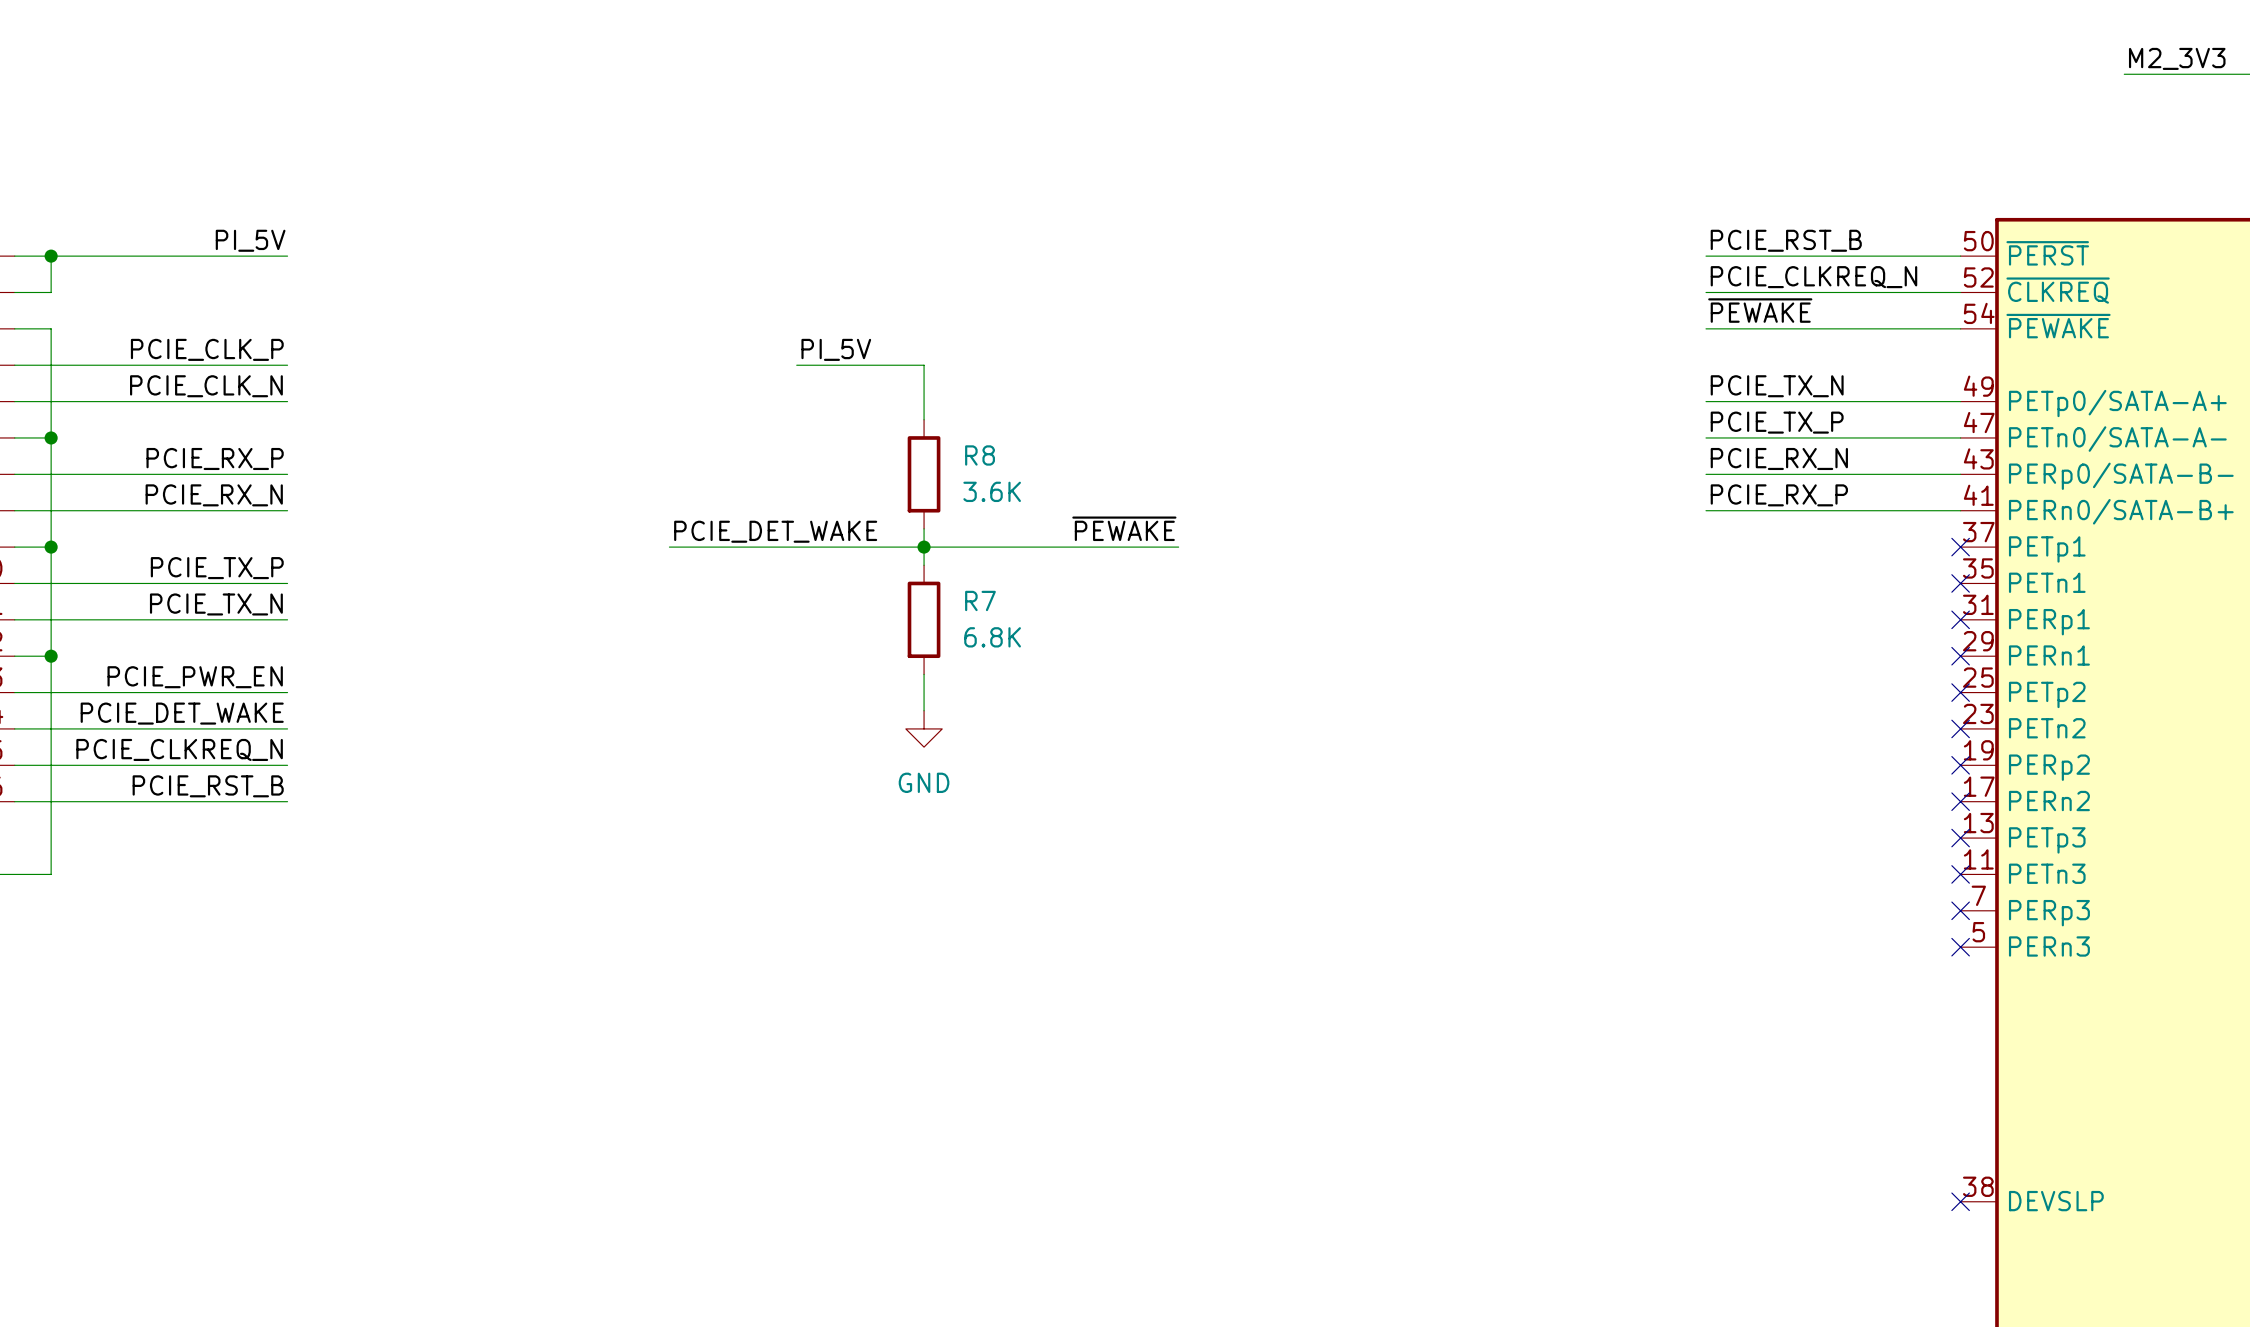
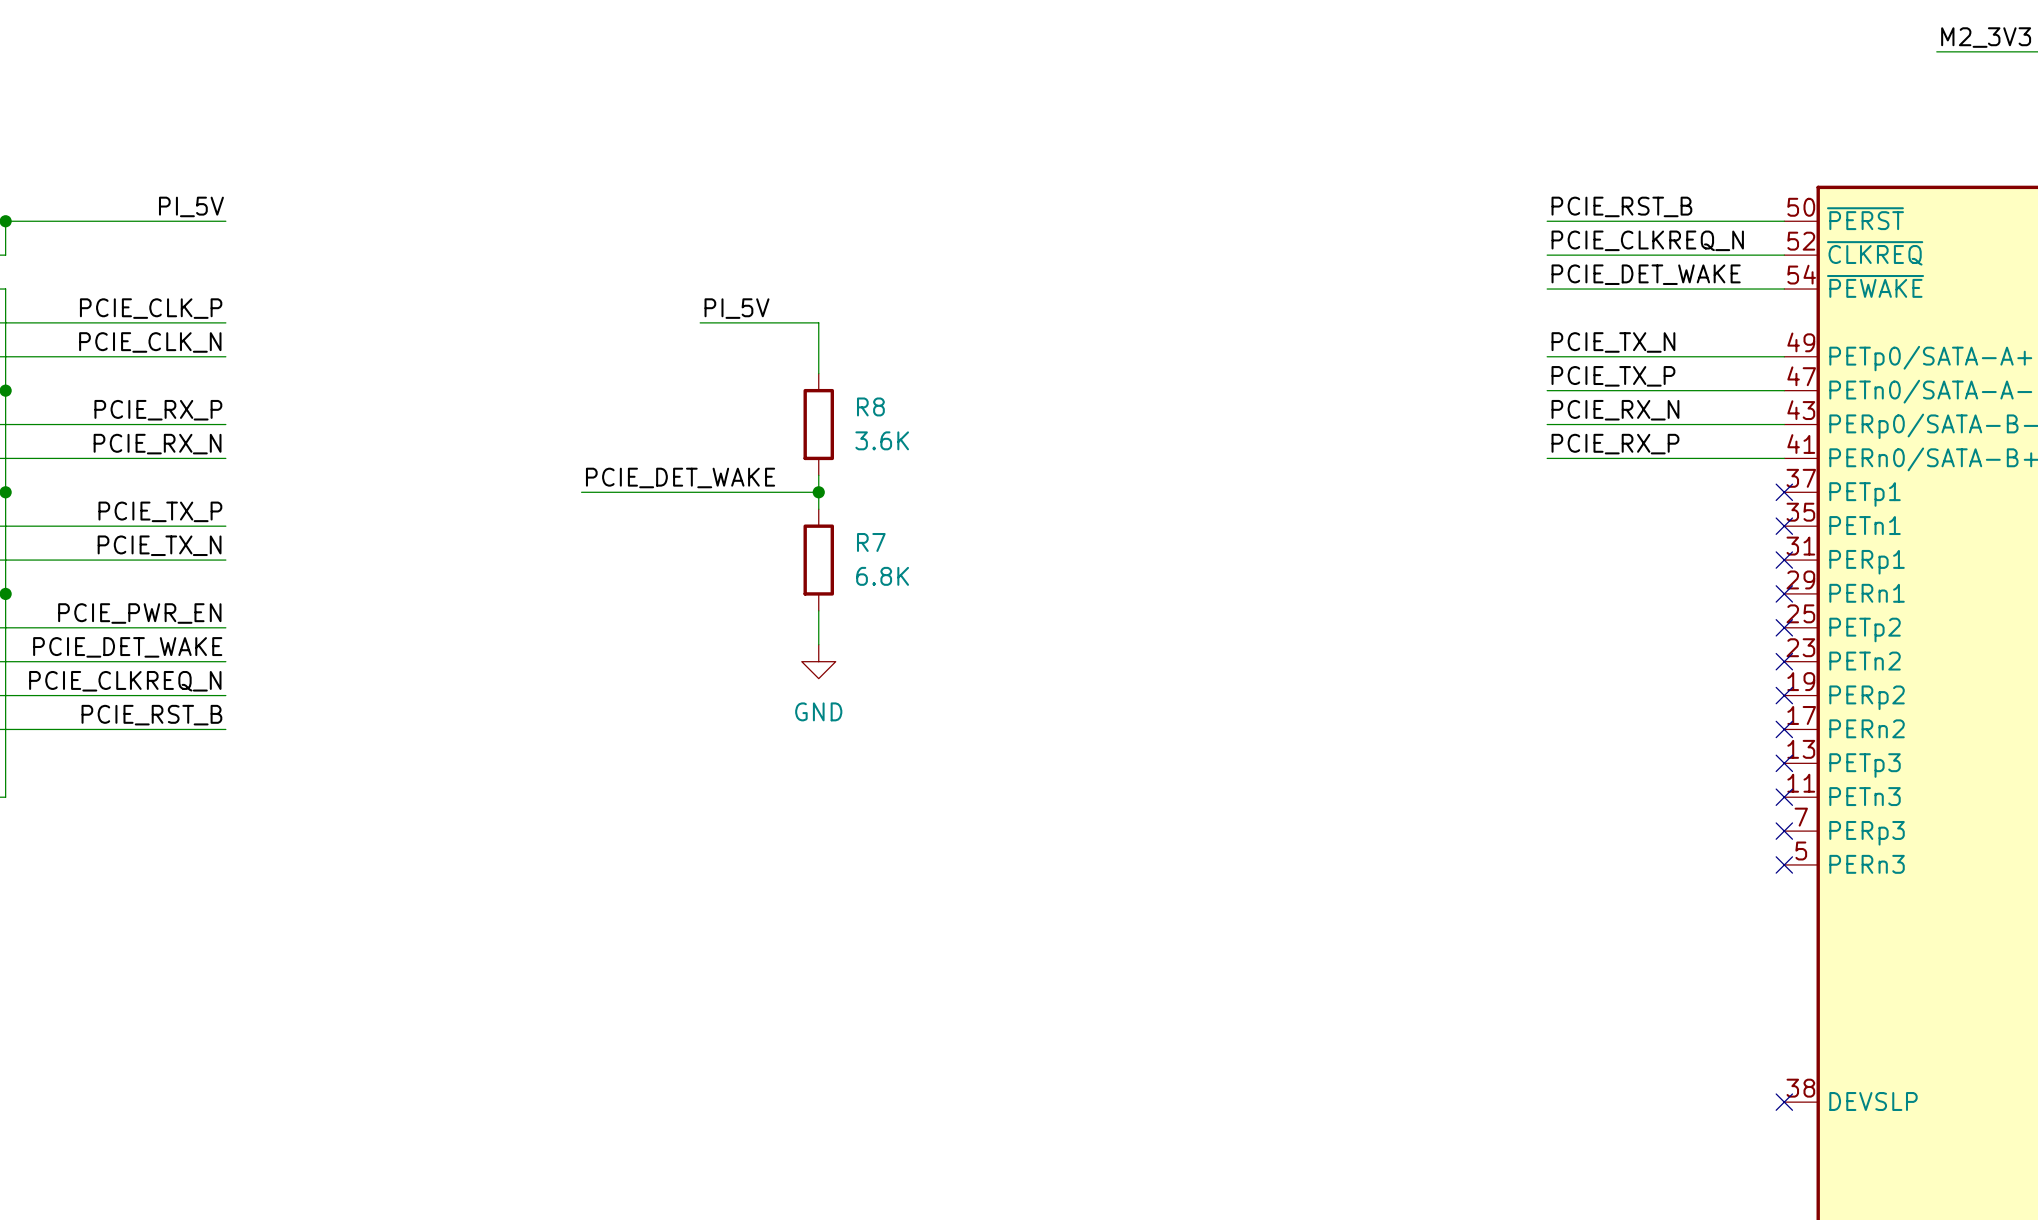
label: ~{PEWAKE} (1760, 310) -> PCIE_DET_WAKE (1646, 274)
label: ~{PEWAKE} (1124, 528) -> none
wire: (924, 547) (1178, 547) -> none

